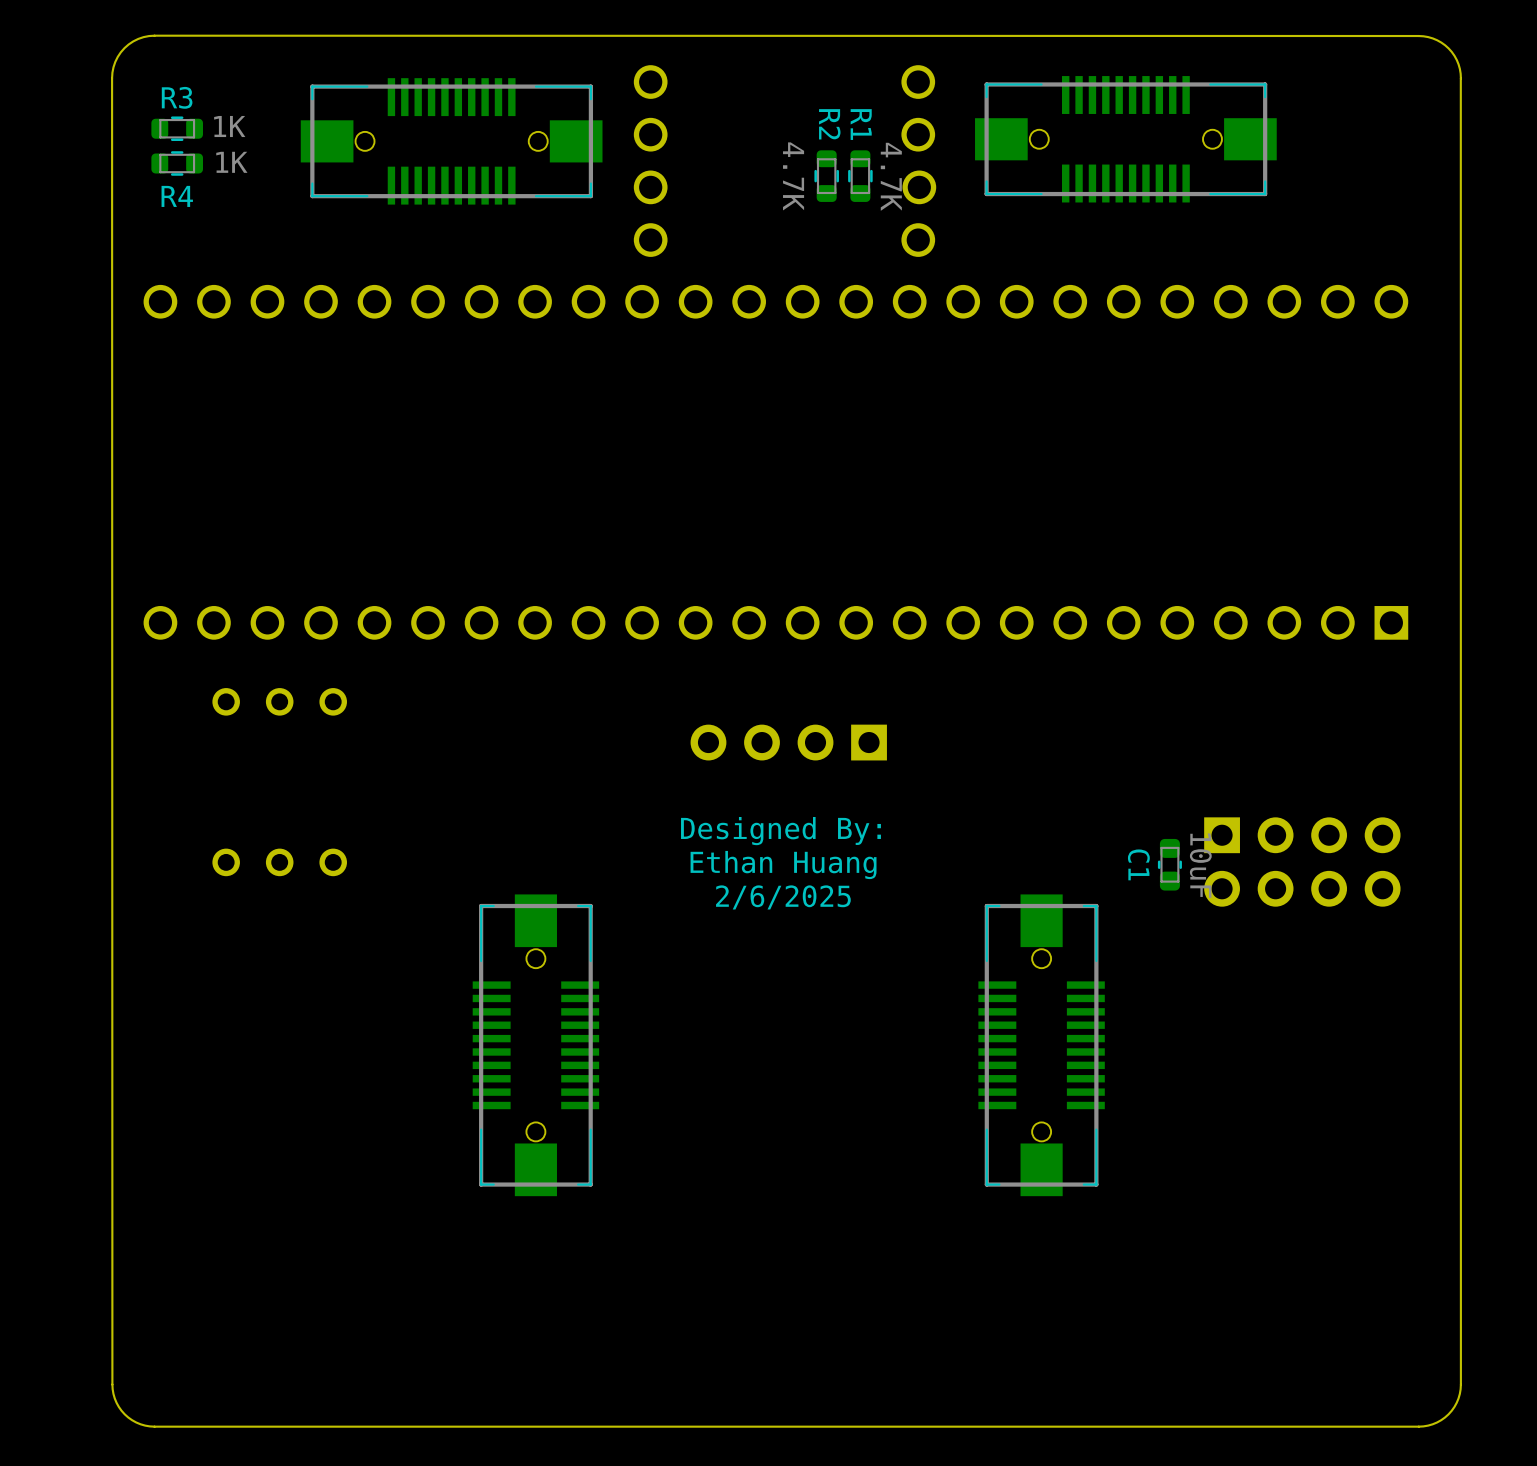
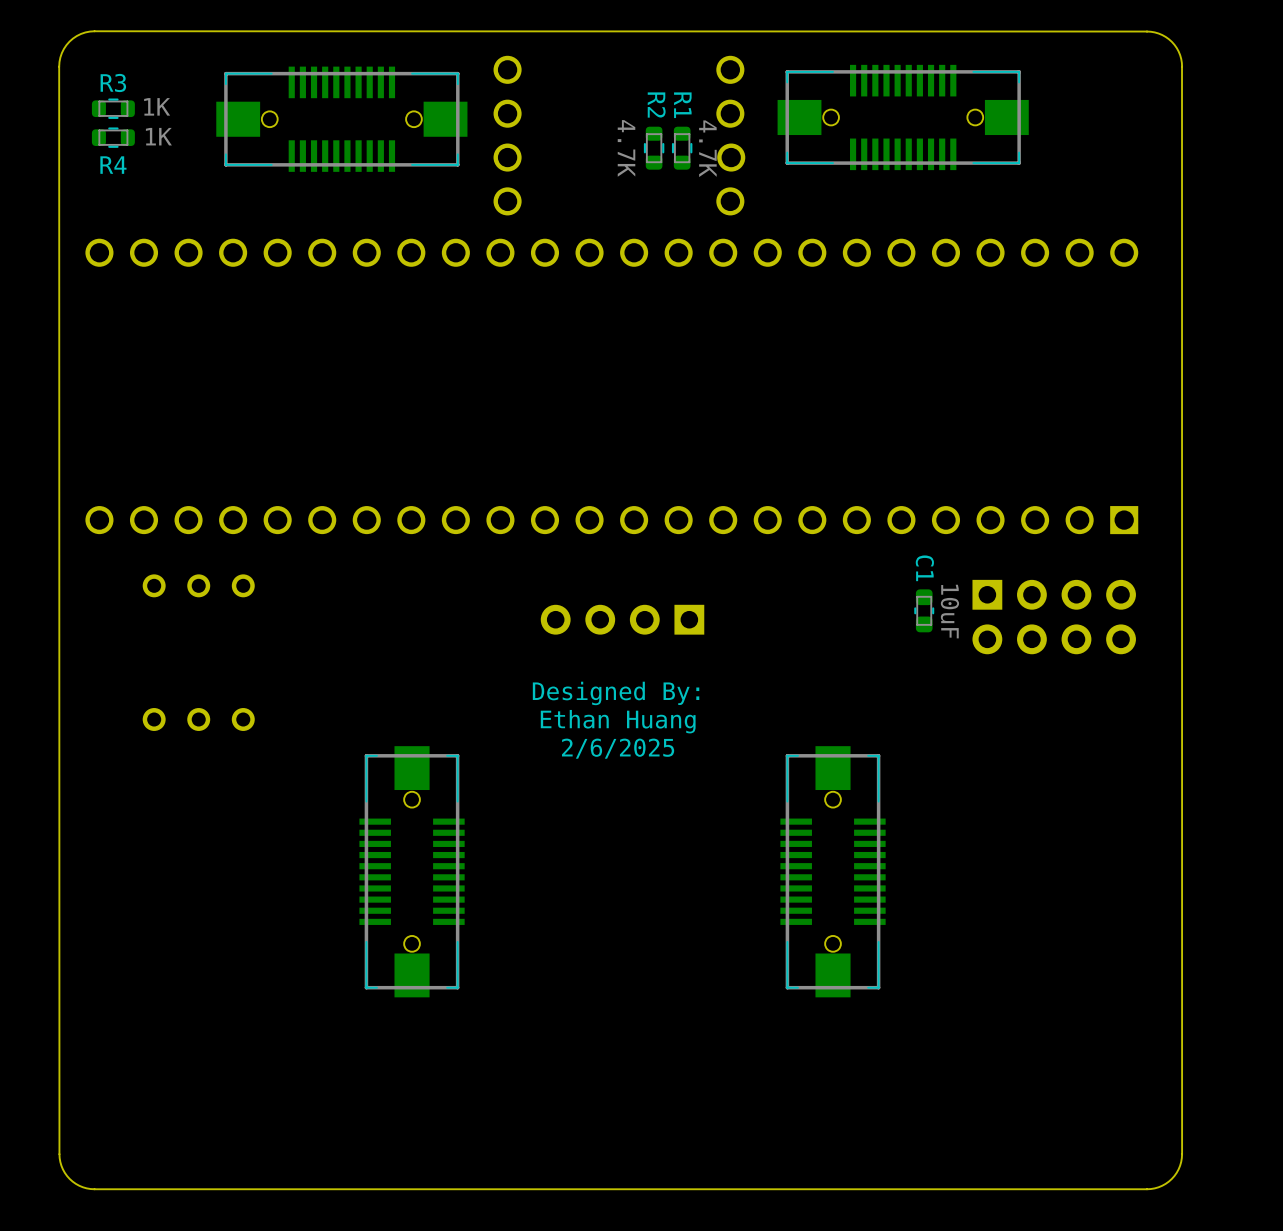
part position: (1302, 862) -> (1054, 617)
C1 name position: C1 (1138, 864) -> C1 (924, 568)
C1 position: (1169, 864) -> (924, 610)

